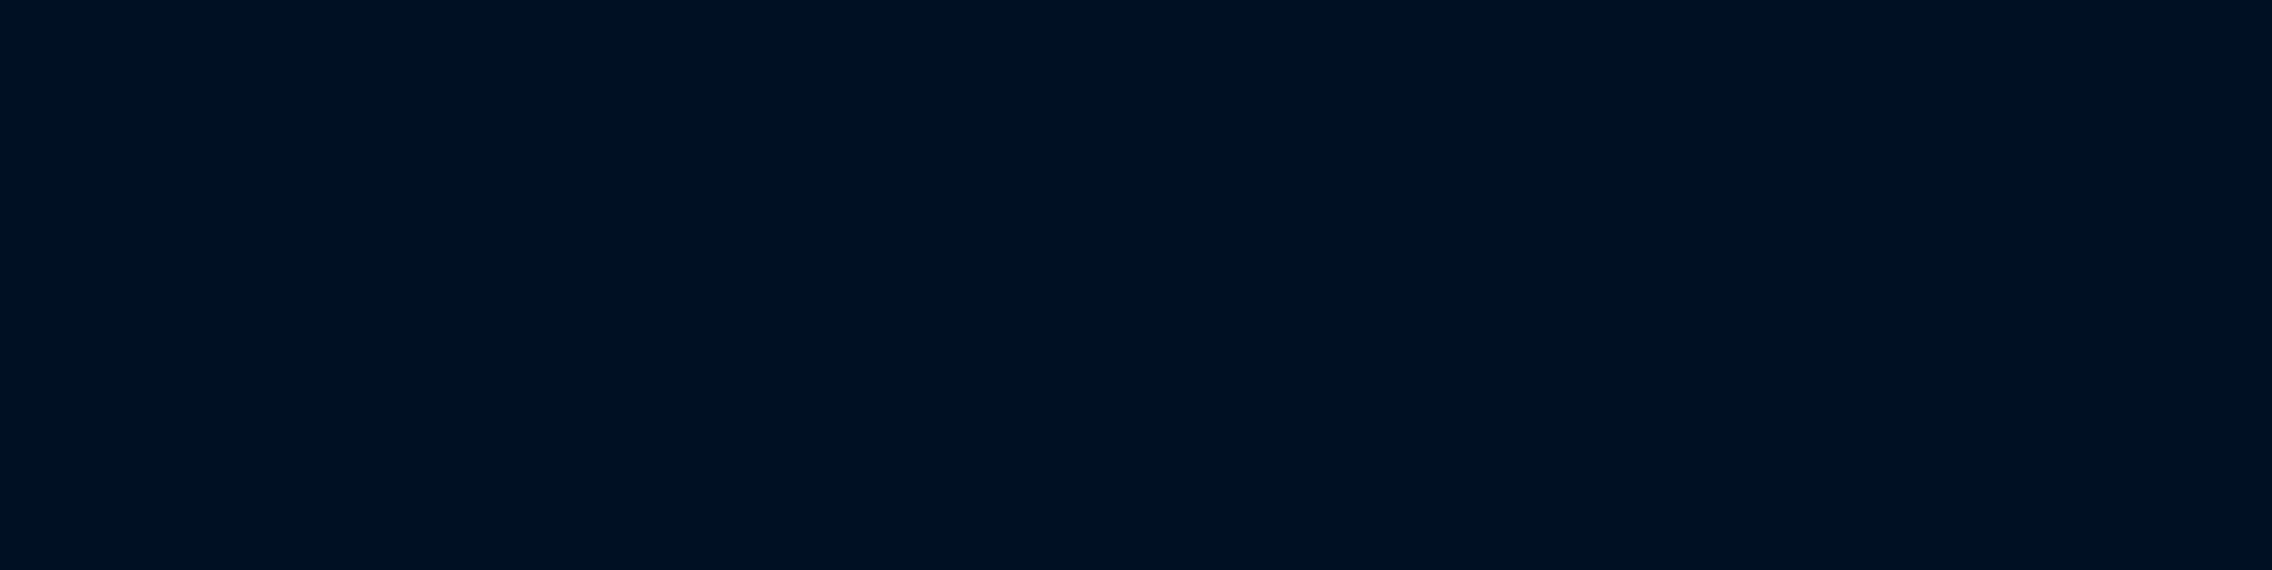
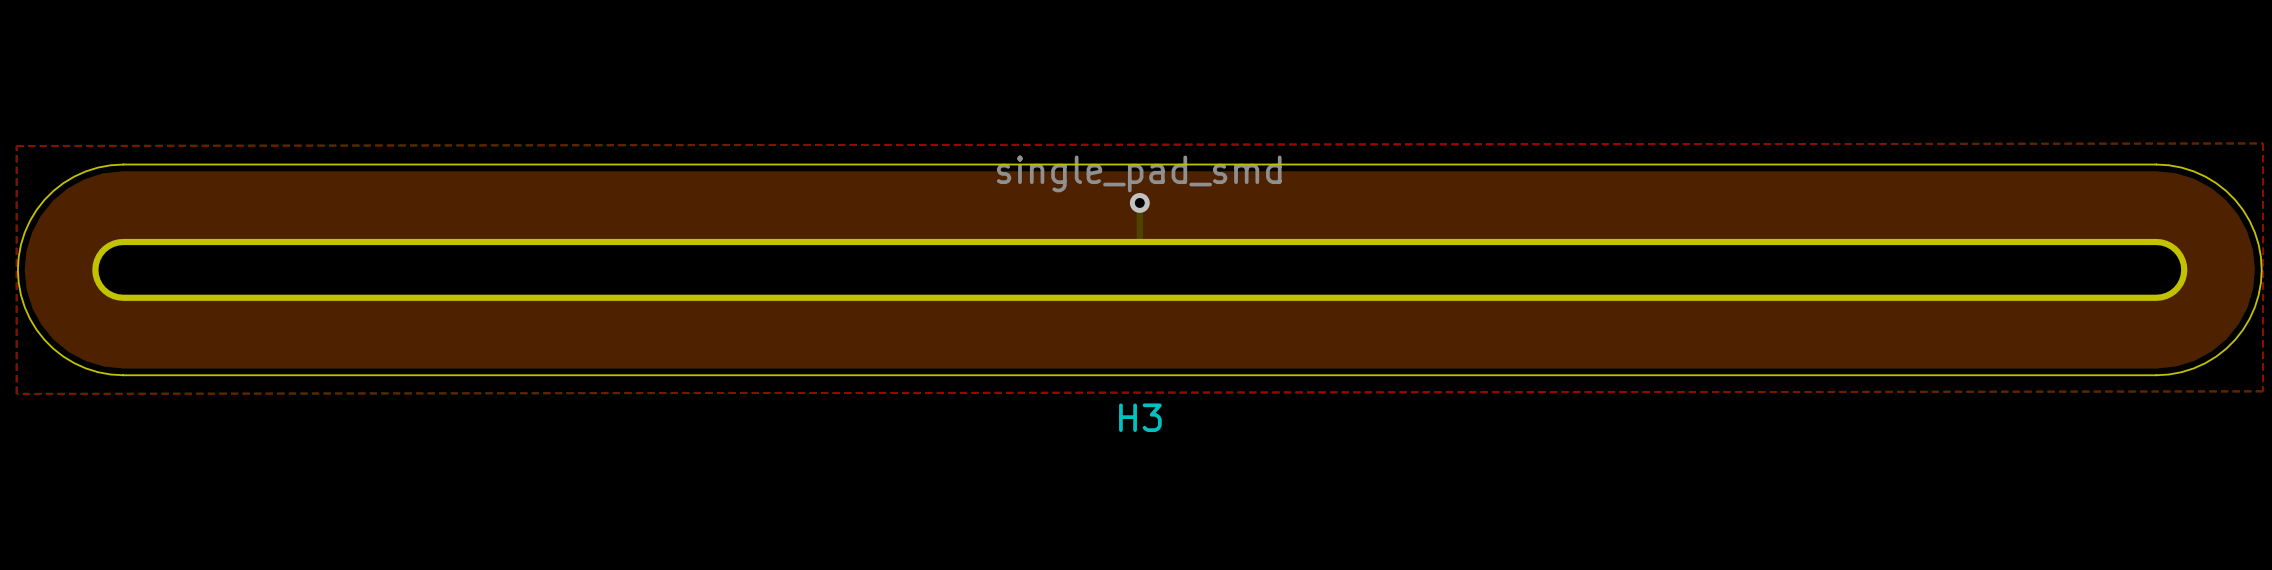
top zone outline: none -> (2262, 143) (16, 145) (16, 393) (2262, 391) (2262, 143)
board edge: none -> (123, 164) (2156, 164) (2181, 167) (2193, 171) (2216, 183) (2235, 200) (2249, 220) (2254, 232) (2260, 257) (2261, 269) (2260, 282) (2254, 307) (2249, 318) (2235, 339) (2216, 356) (2205, 363) (2181, 372) (2156, 375) (123, 375) (110, 374) (85, 368) (74, 363) (53, 348) (44, 339) (29, 318) (20, 295) (17, 269) (20, 244) (29, 220) (44, 200) (53, 191) (74, 176) (85, 171) (110, 165) (123, 164)
via: none -> (1139, 202)
H3: none -> single_pad_smd (1139, 269)

